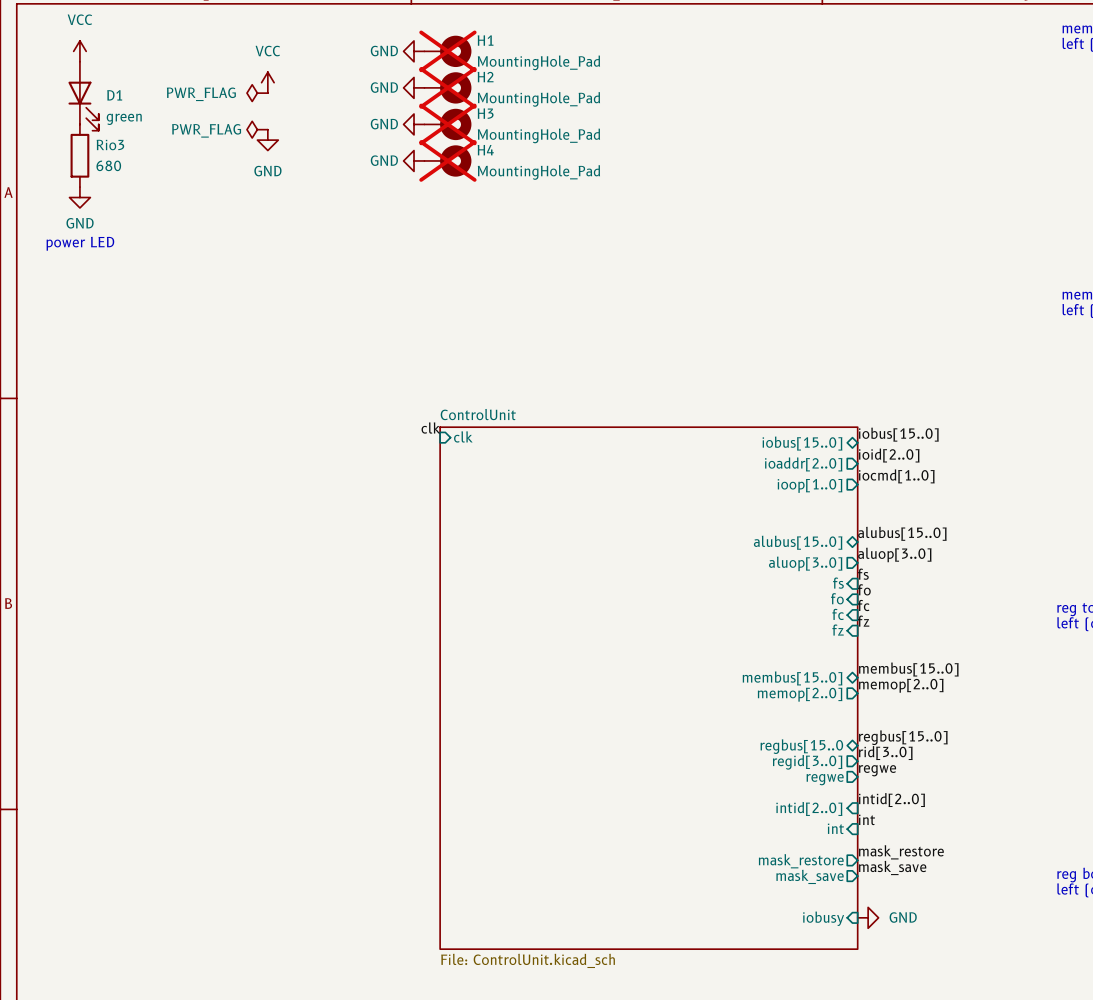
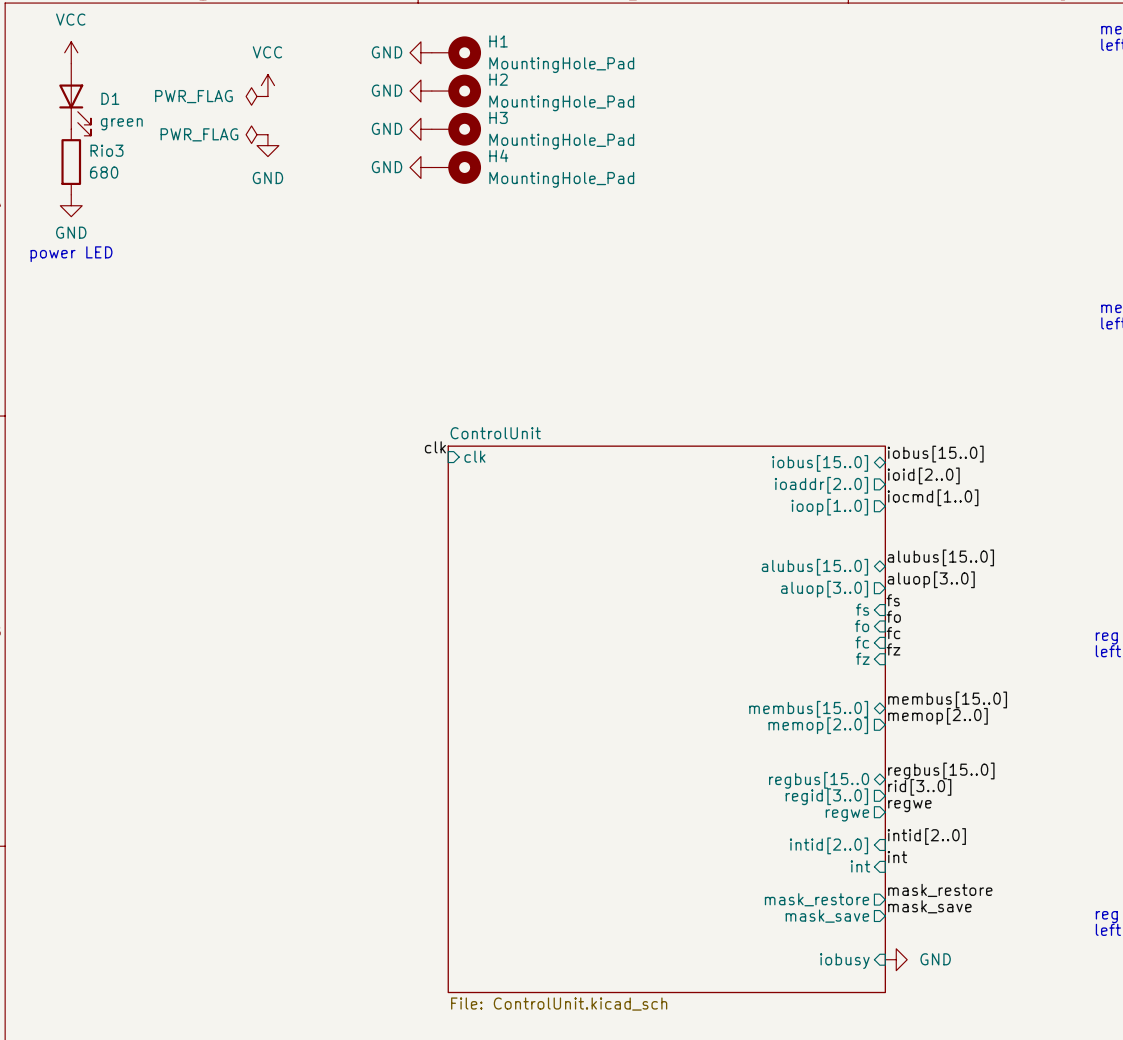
H1 do-not-place cross: (447, 51) -> none
H2 do-not-place cross: (447, 87) -> none
H3 do-not-place cross: (447, 124) -> none
H4 do-not-place cross: (447, 160) -> none

